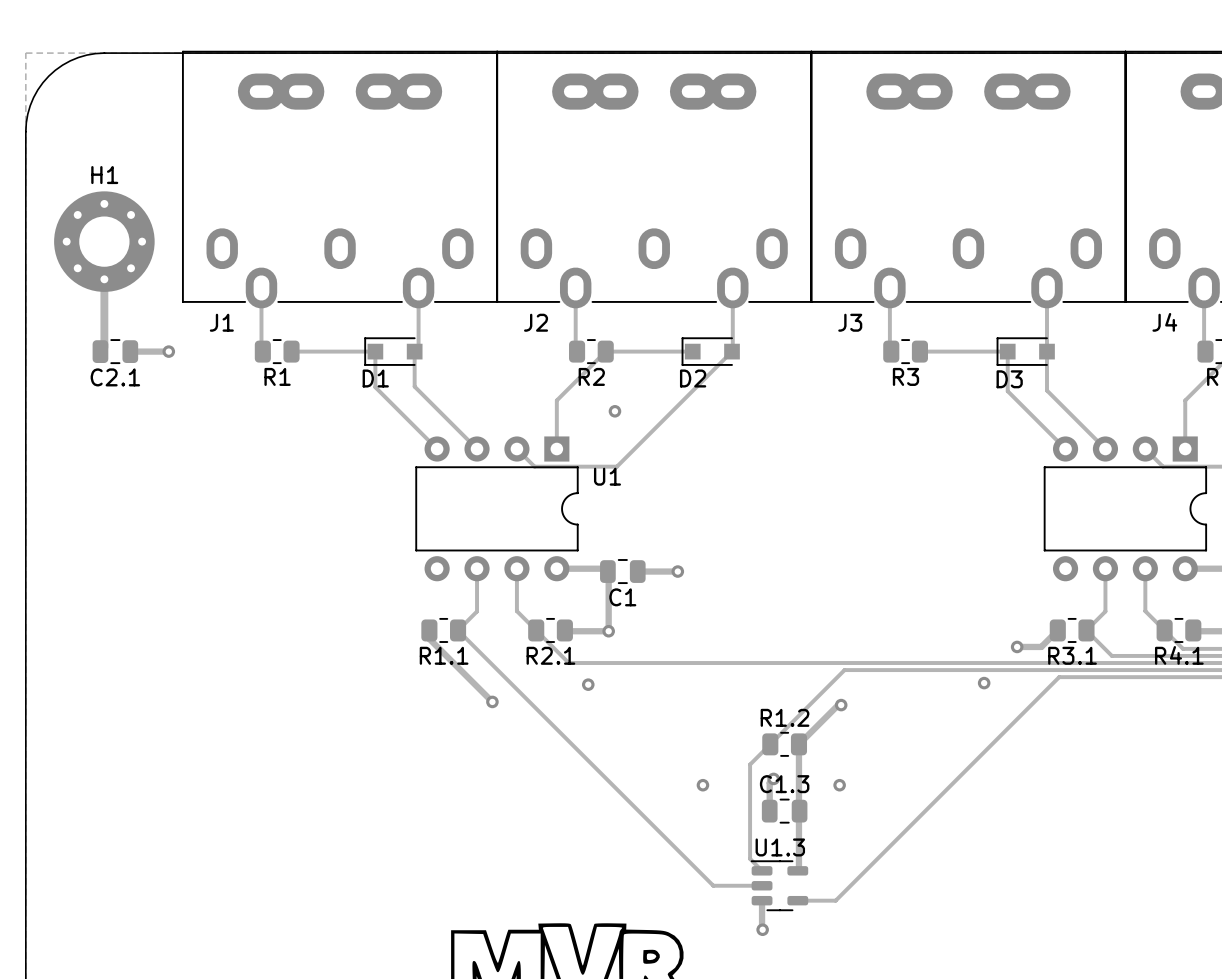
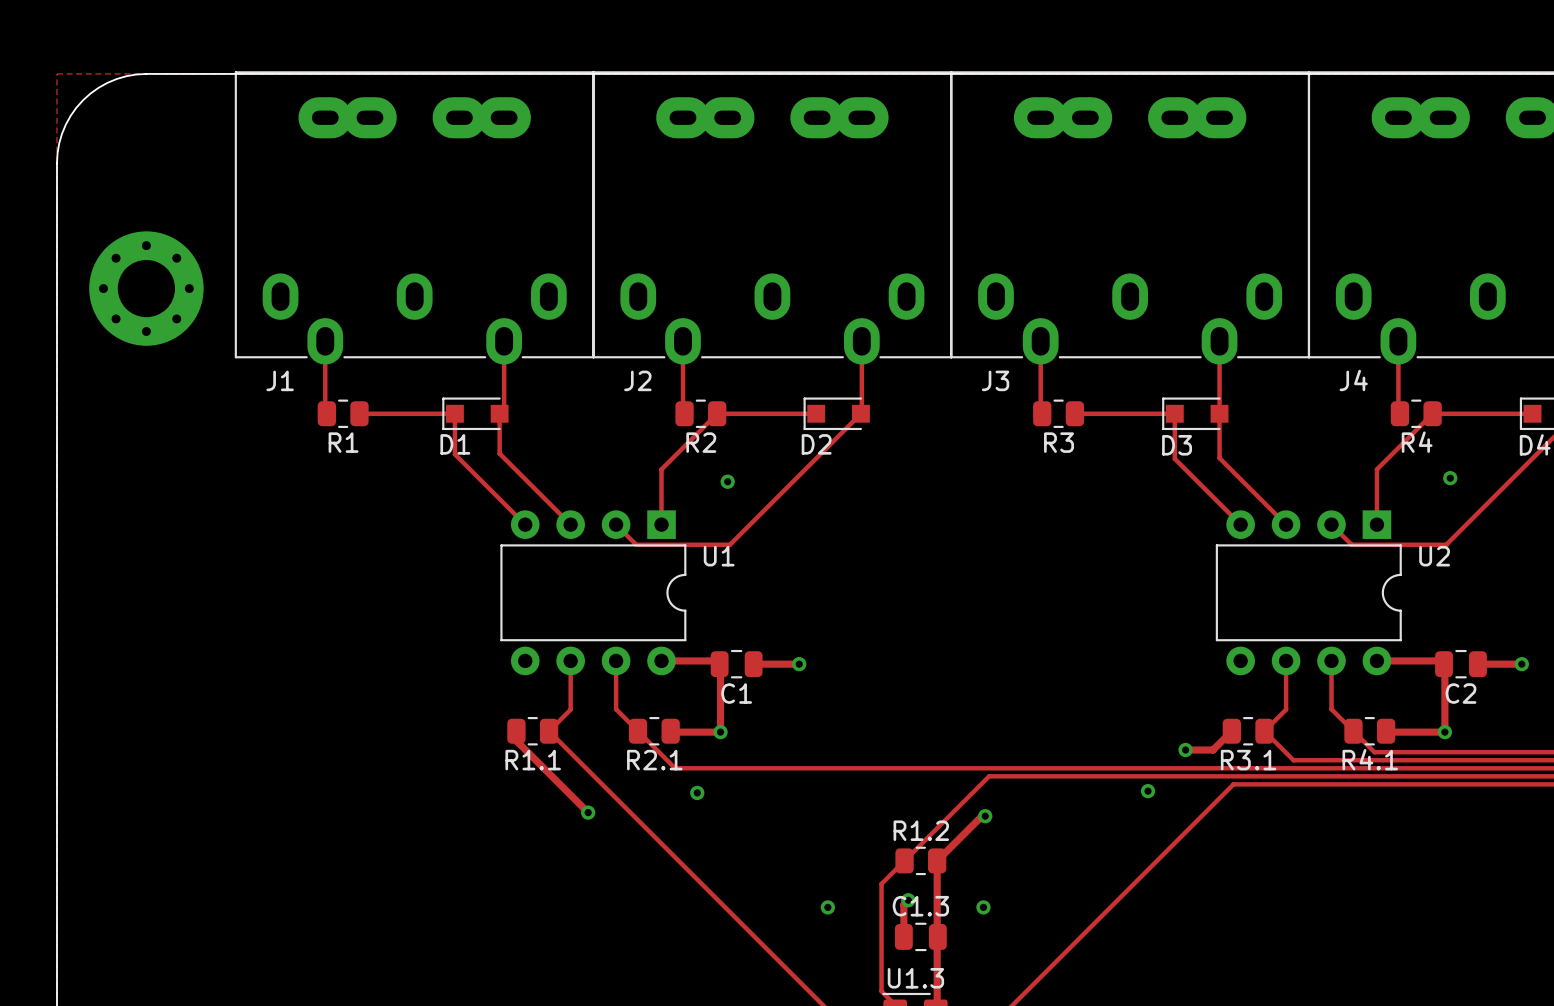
H1 name: H1 (104, 175) -> none
track: (104, 241) (104, 347) (100, 351) -> none
C2.1: (115, 351) -> none
track: (130, 351) (168, 351) -> none
via: (168, 351) -> none

